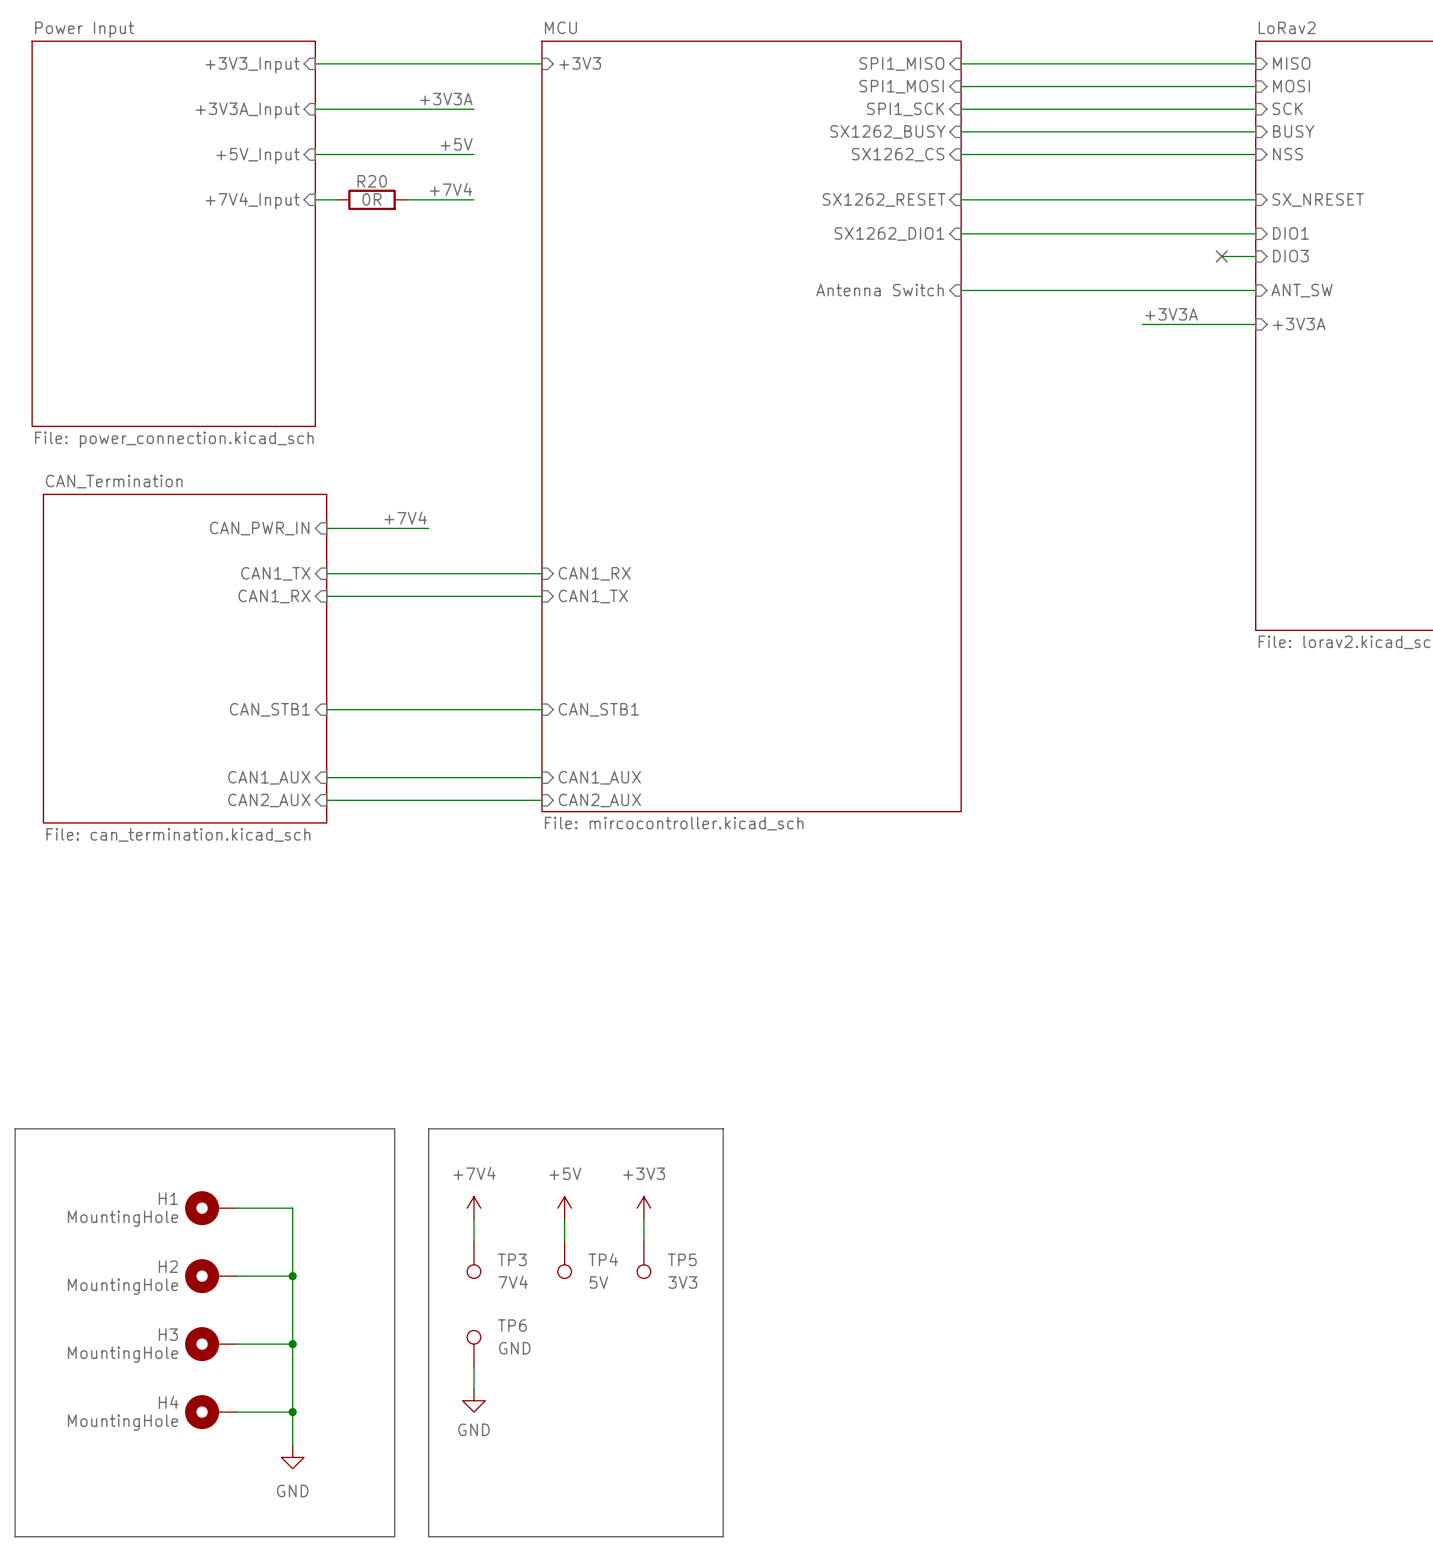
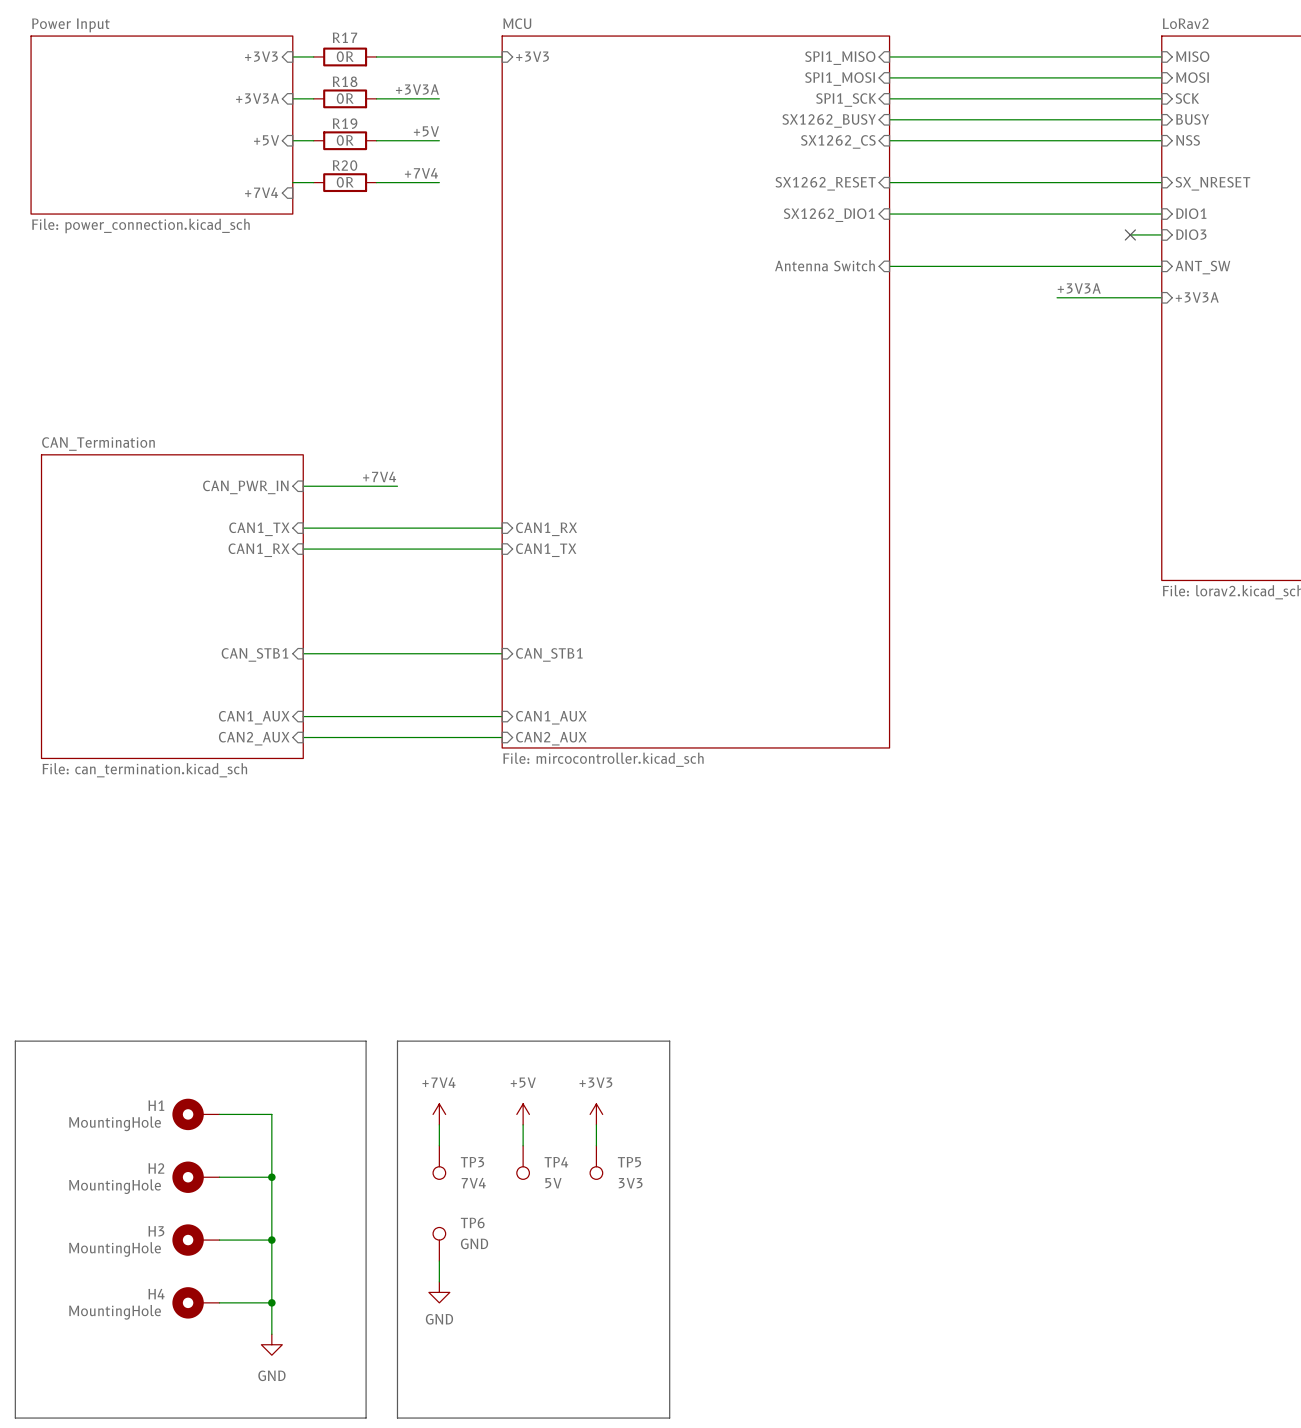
wire: (338, 63) (406, 63) -> none
R17: none -> 0R (345, 56)
sheet pin: +3V3_Input (252, 65) -> +3V3 (261, 56)
wire: (338, 109) (406, 109) -> none
R18: none -> 0R (345, 98)
sheet pin: +3V3A_Input (247, 110) -> +3V3A (257, 98)
sheet Power Input: none -> File: power_connection.kicad_sch (161, 125)
wire: (338, 154) (406, 154) -> none
R19: none -> 0R (345, 140)
sheet pin: +5V_Input (258, 155) -> +5V (266, 140)
sheet pin: +7V4_Input (252, 201) -> none
sheet pin: none -> +7V4 (261, 192)
sheet Power Input: File: power_connection.kicad_sch (173, 233) -> none

